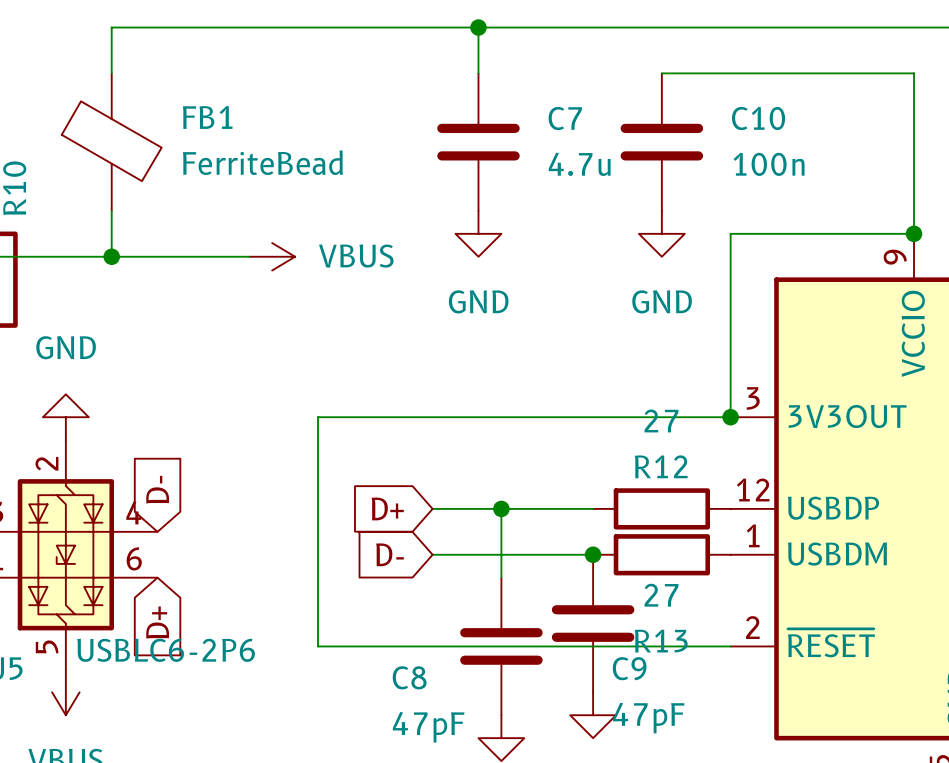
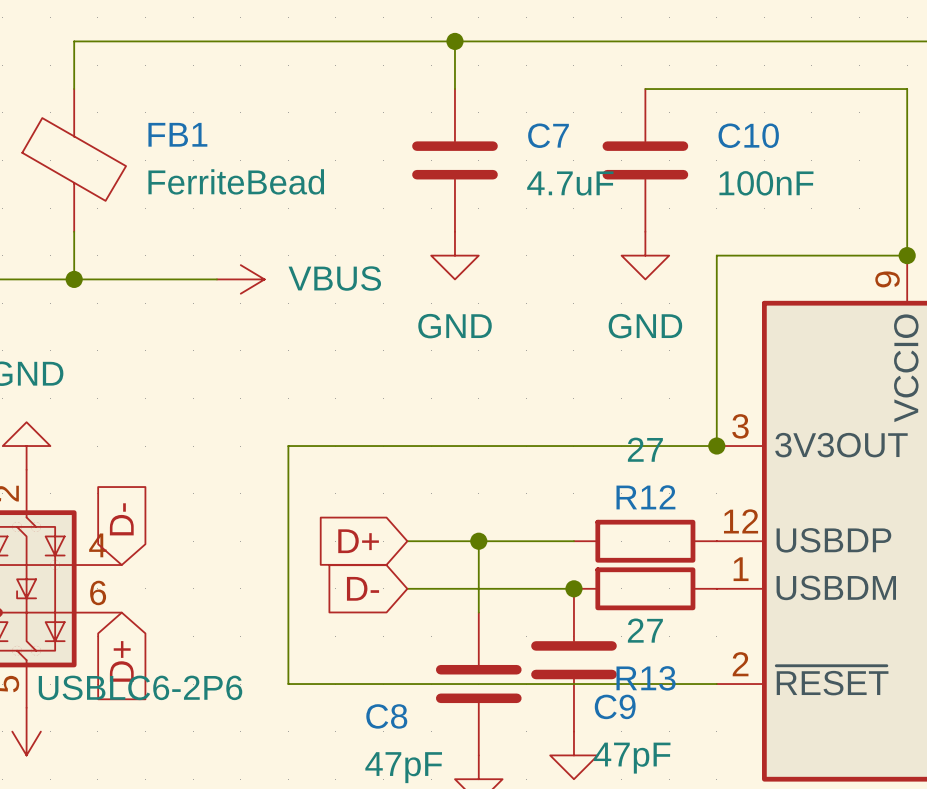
C7 value: 4.7u (579, 164) -> 4.7uF (570, 183)
C10 value: 100n (769, 164) -> 100nF (766, 183)

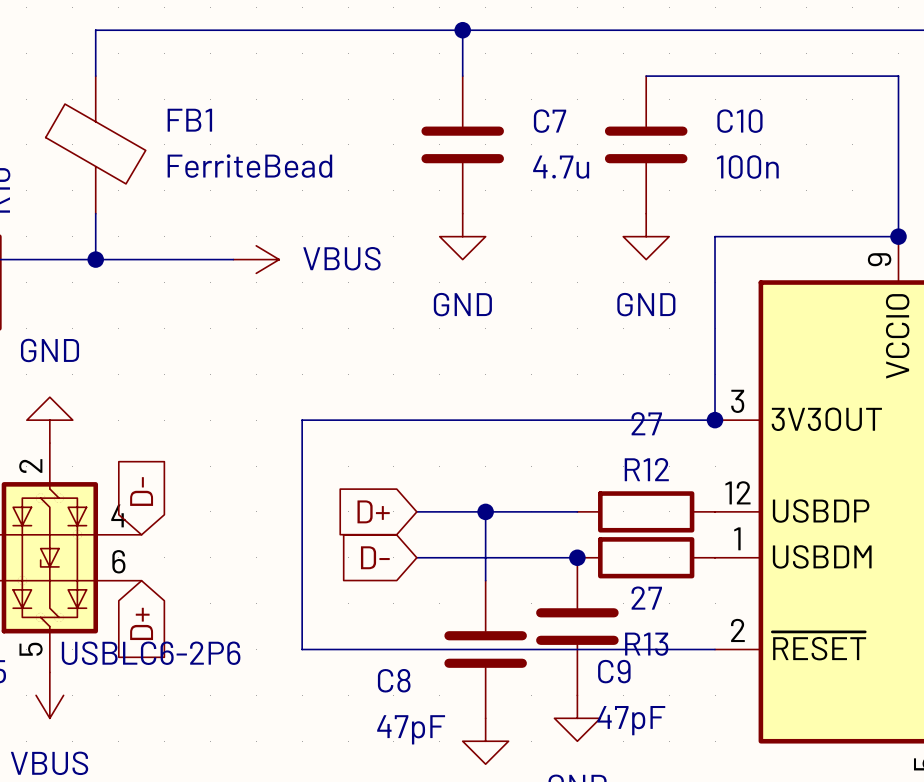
C7 value: 4.7uF (570, 183) -> 4.7u (561, 167)
C10 value: 100nF (766, 183) -> 100n (747, 166)

